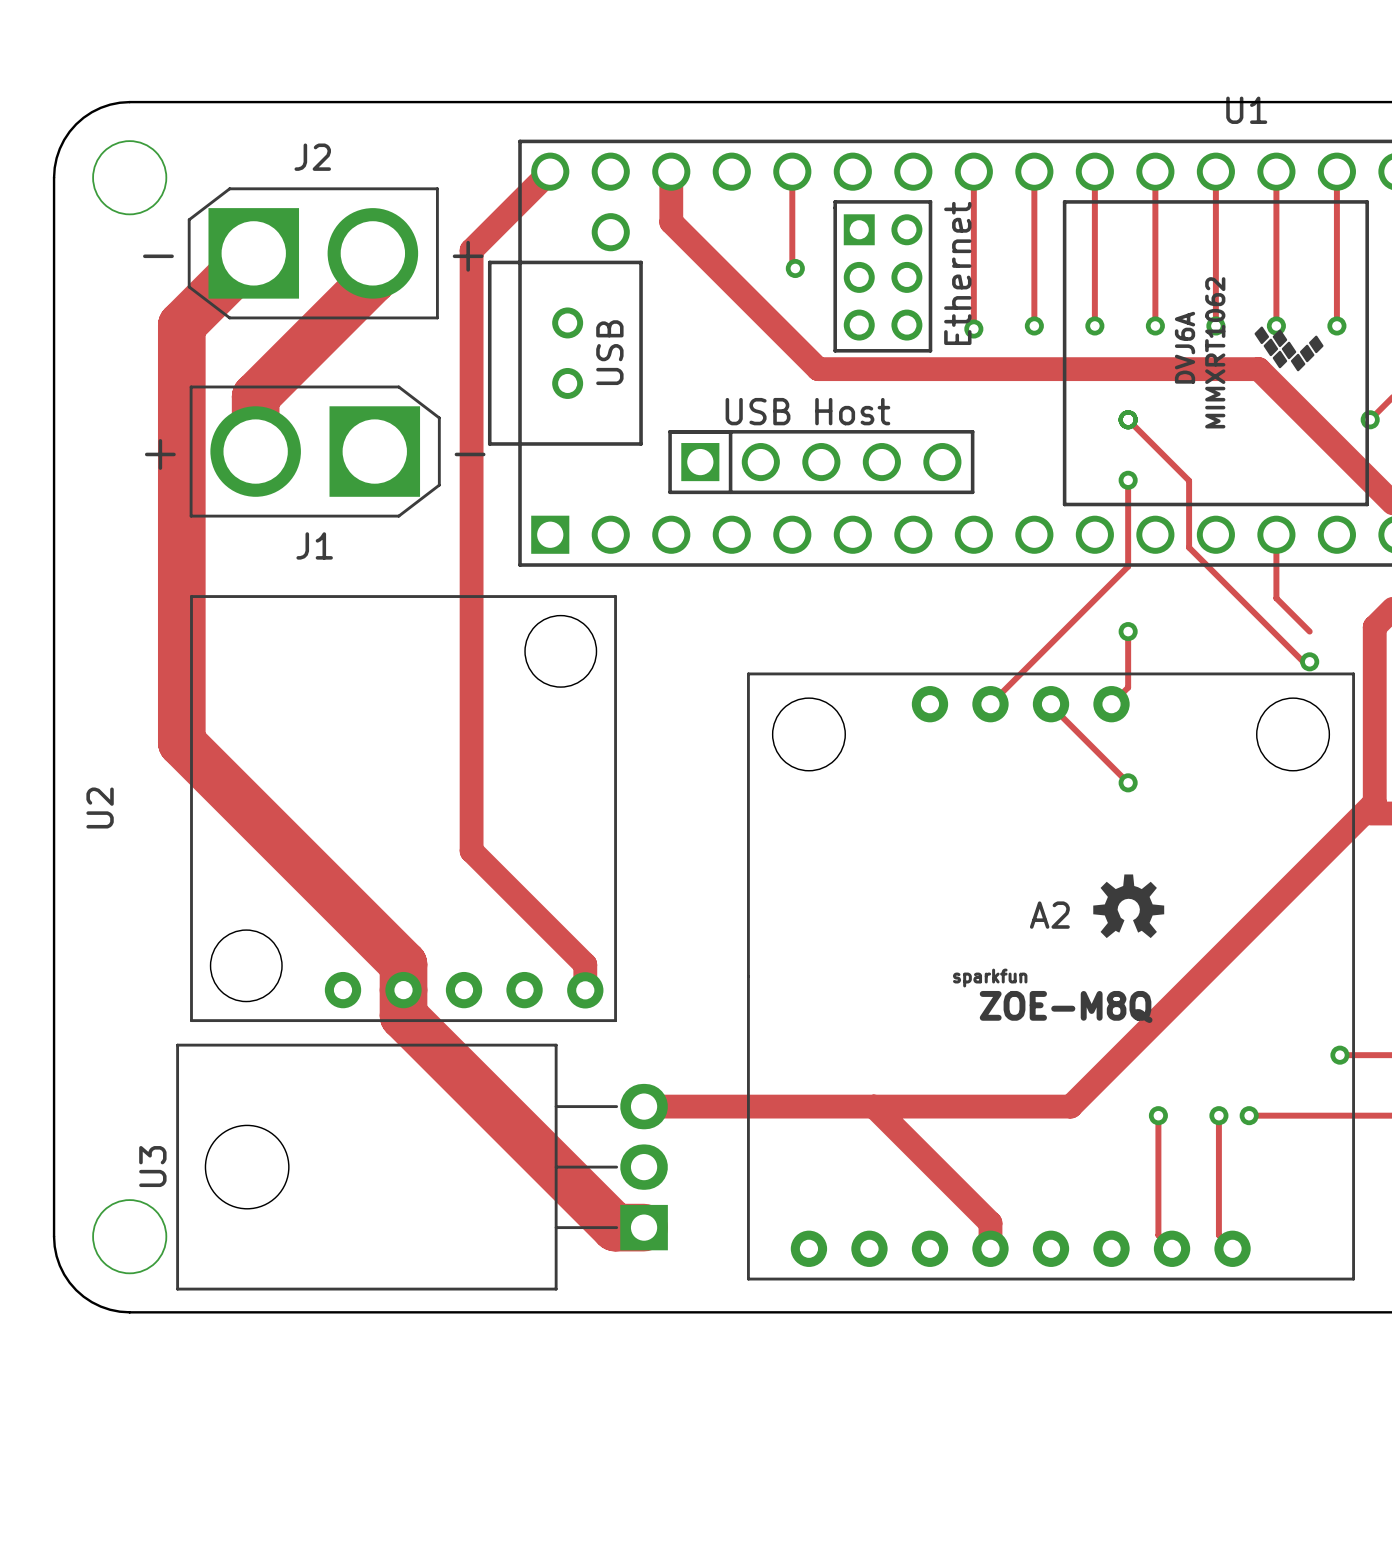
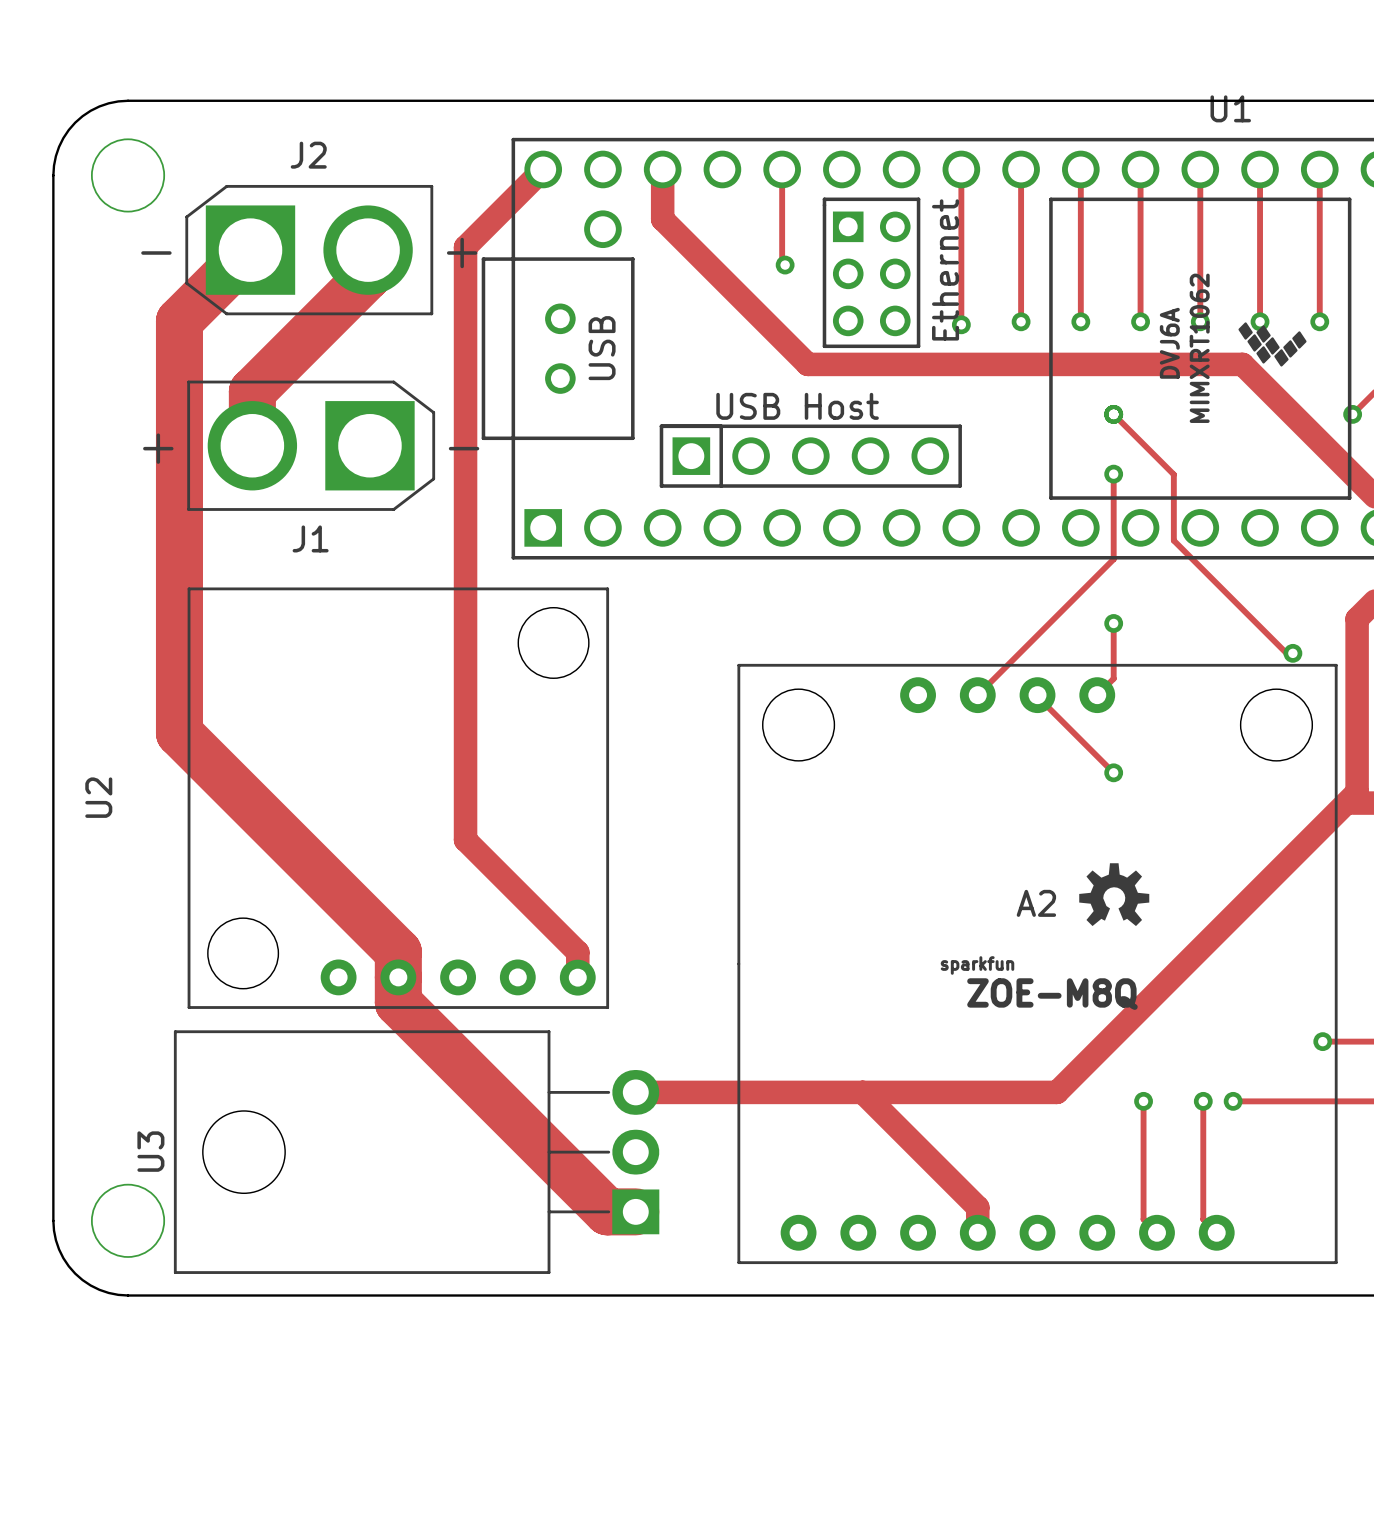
track: (1276, 534) (1276, 598) (1309, 631) -> none

